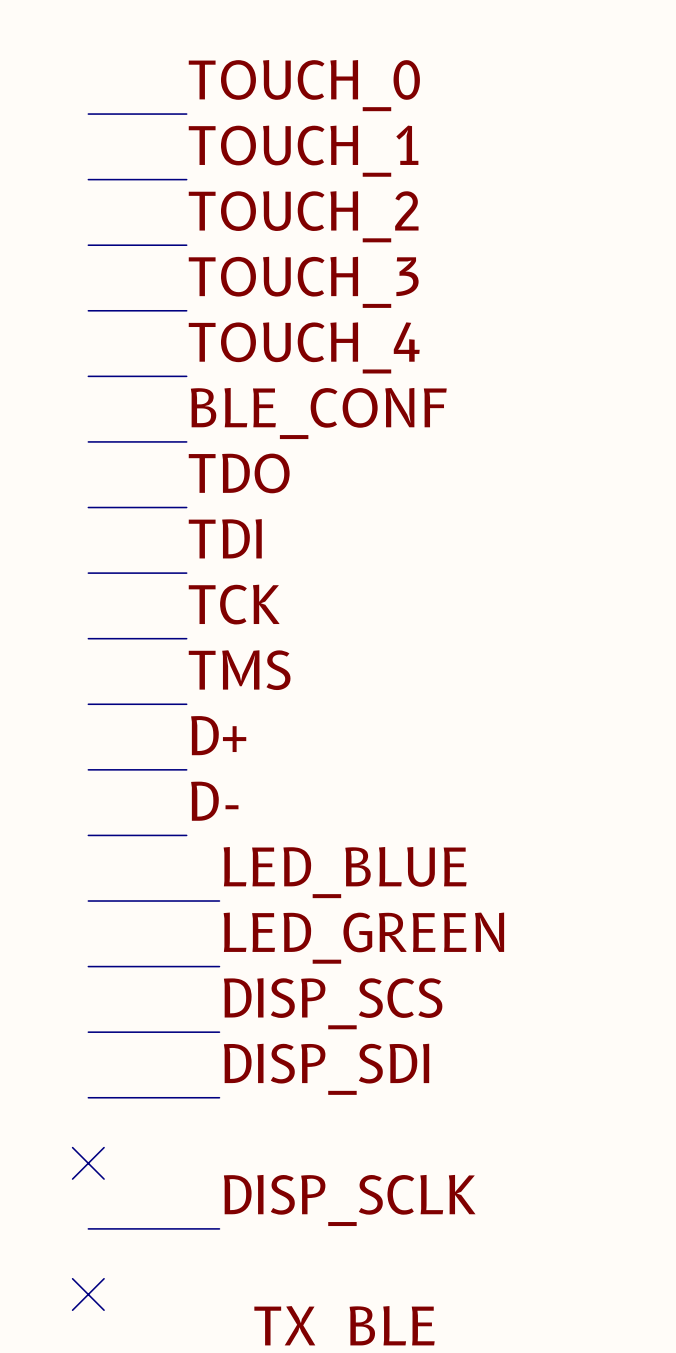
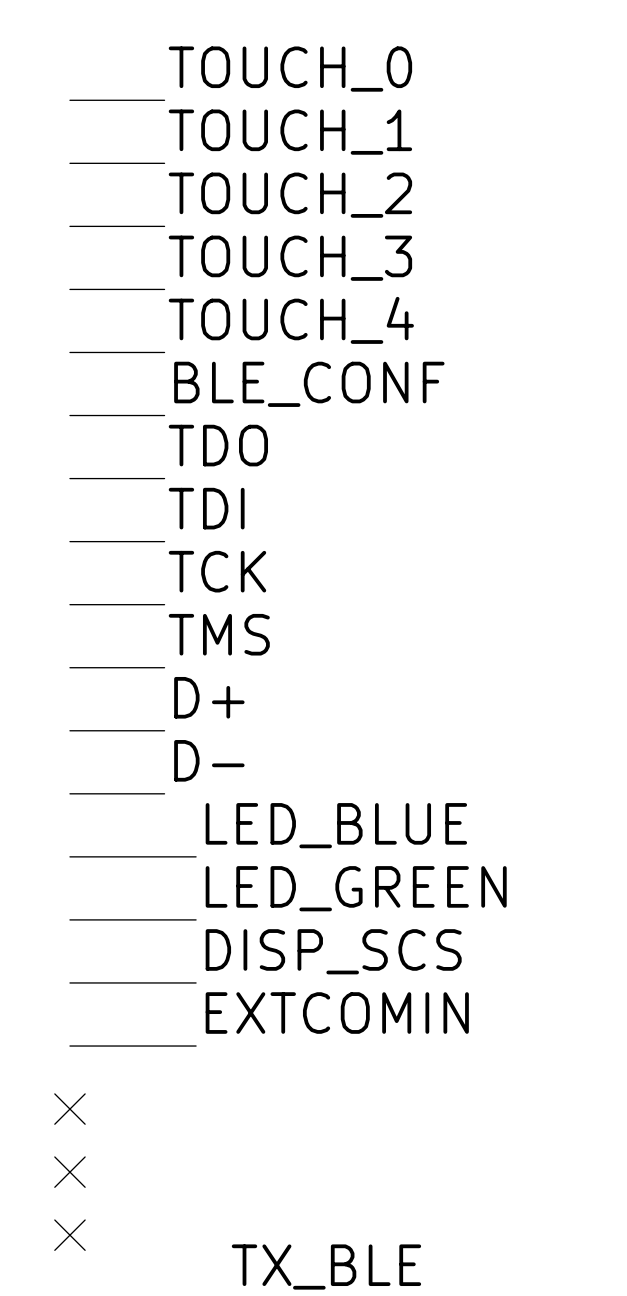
label: DISP_SDI (326, 1069) -> EXTCOMIN (337, 1013)
label: DISP_SCLK (349, 1200) -> none
wire: (88, 1228) (219, 1228) -> none
no-connect mark: none -> (69, 1172)

